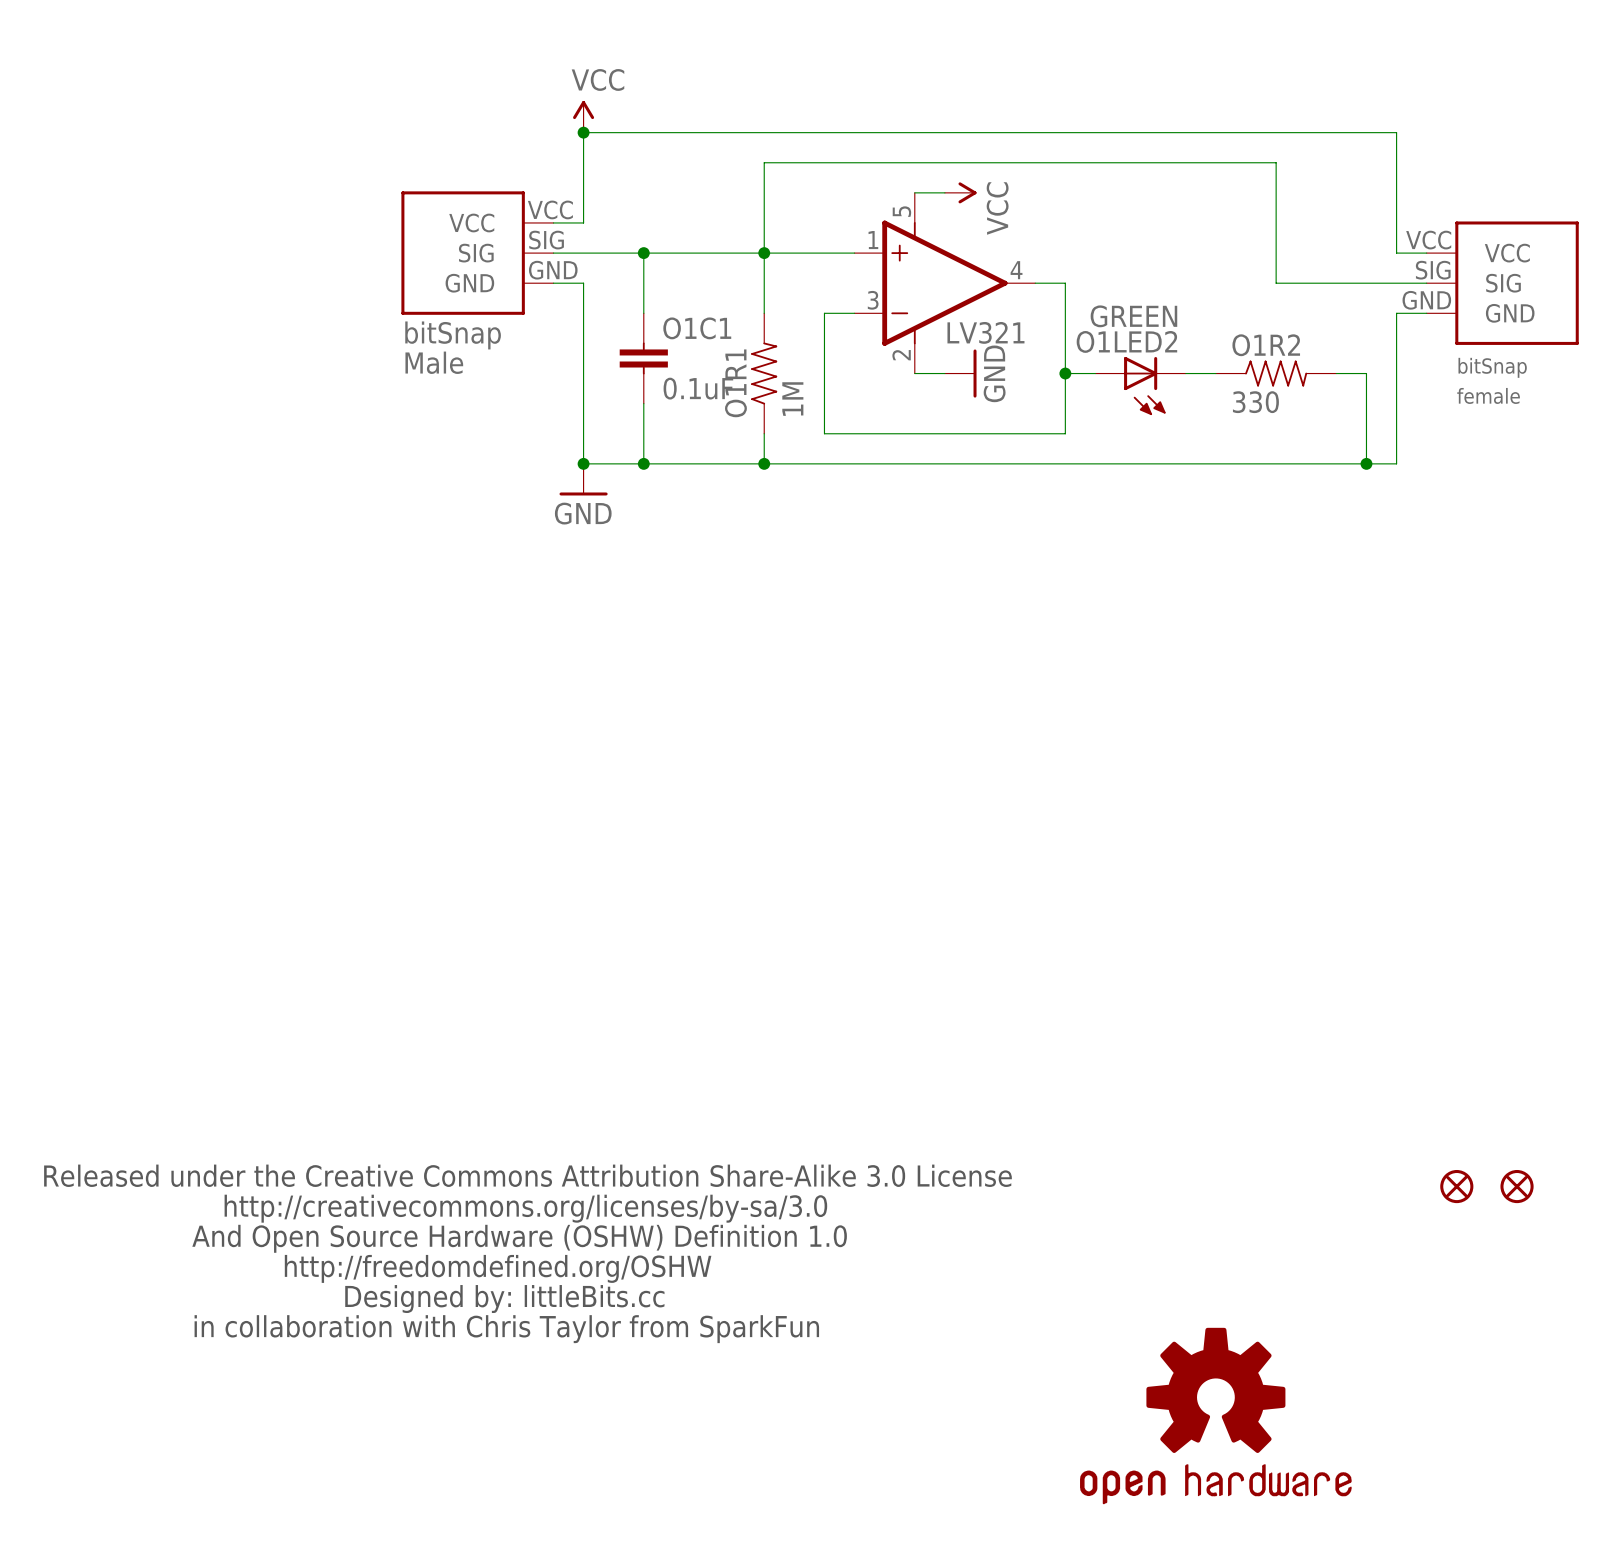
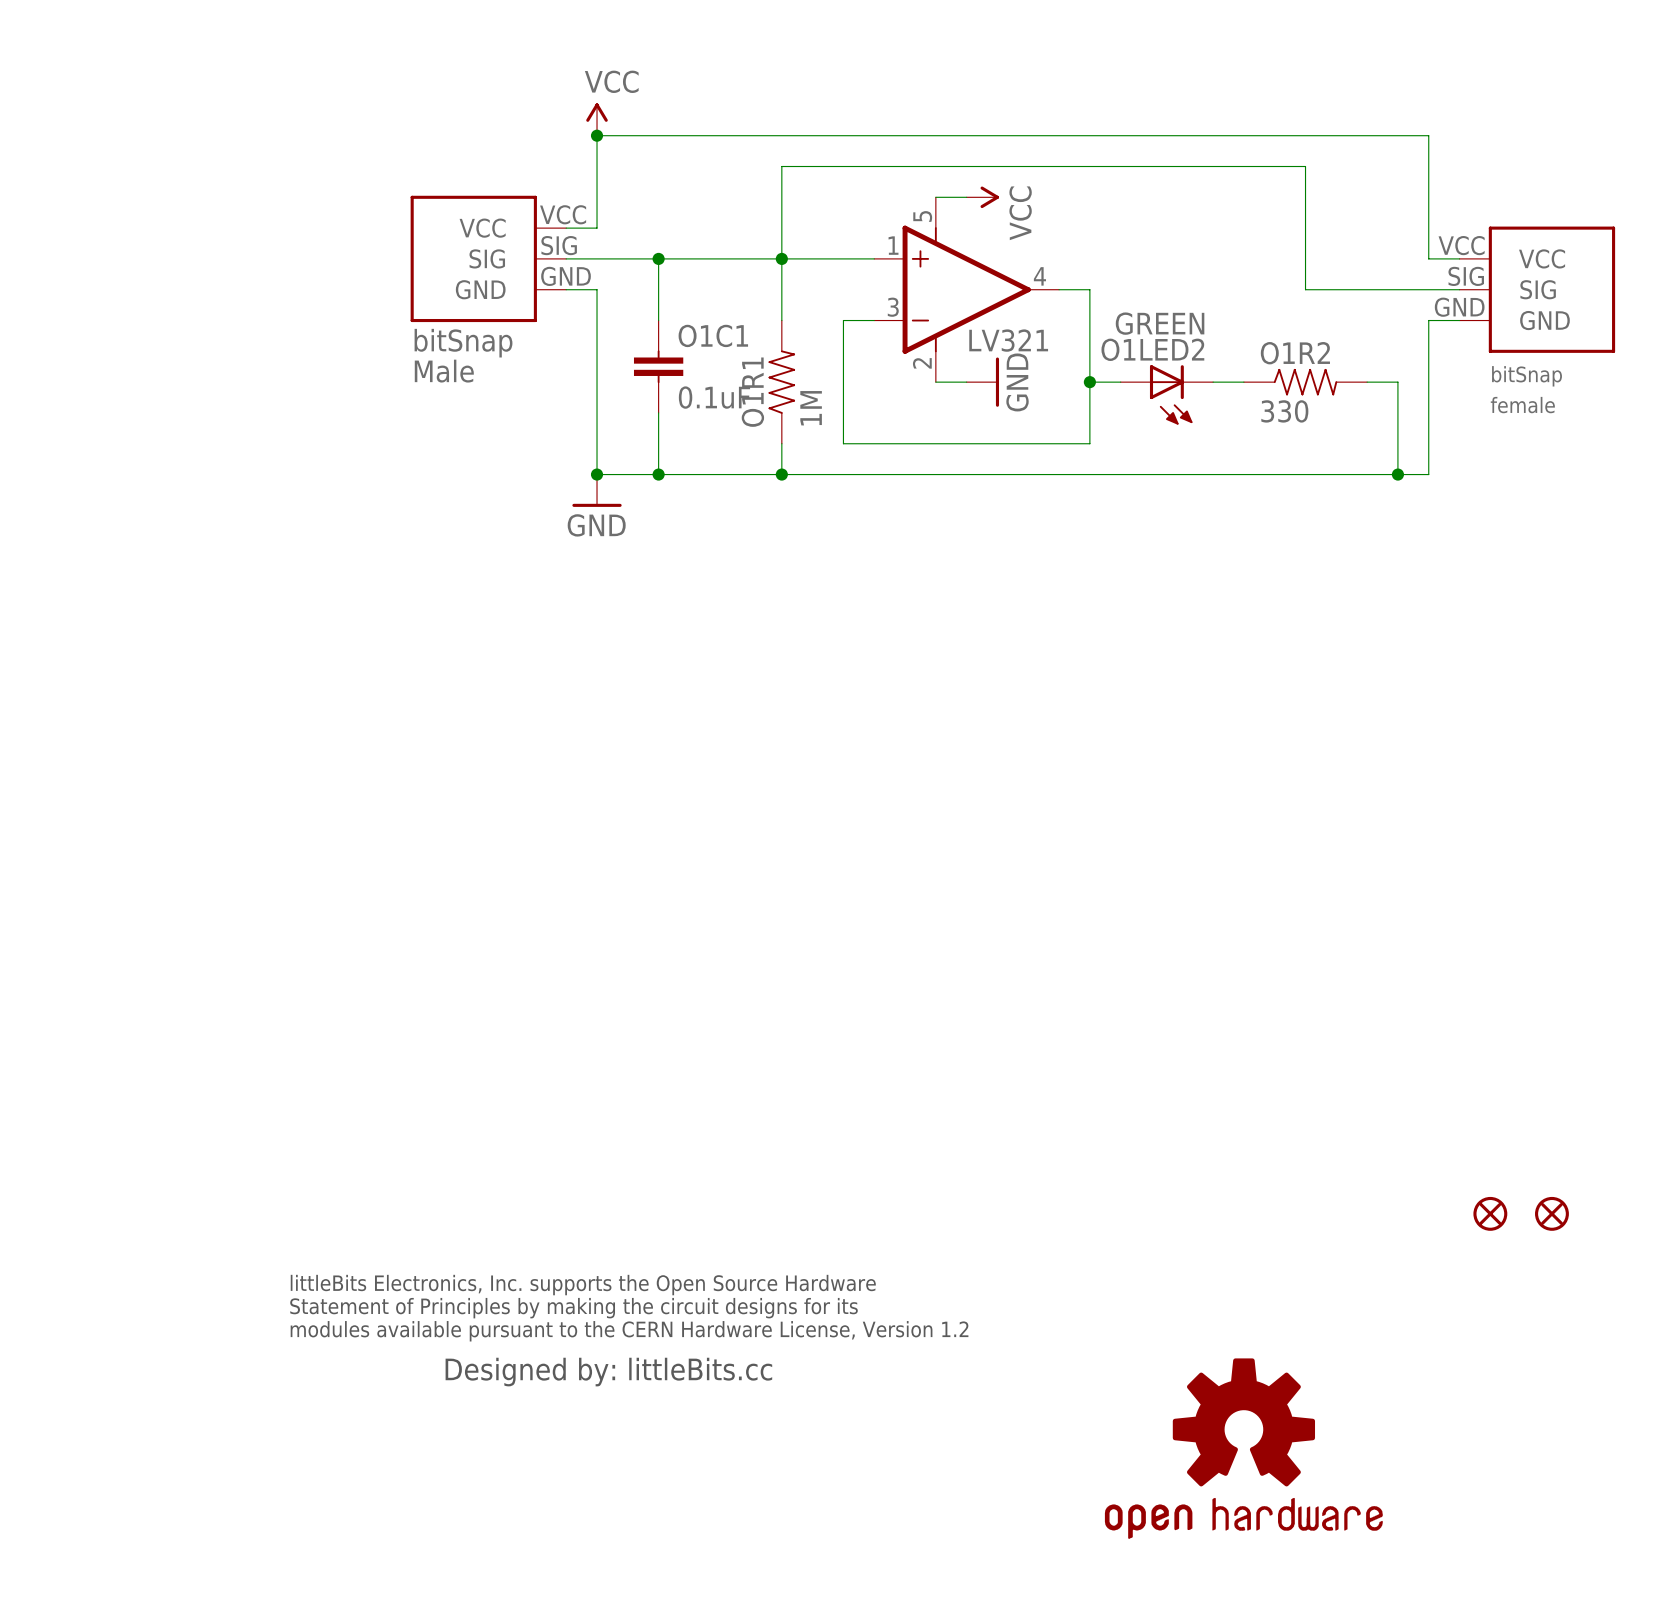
part: (527, 1253) -> none
part: none -> (629, 1330)

